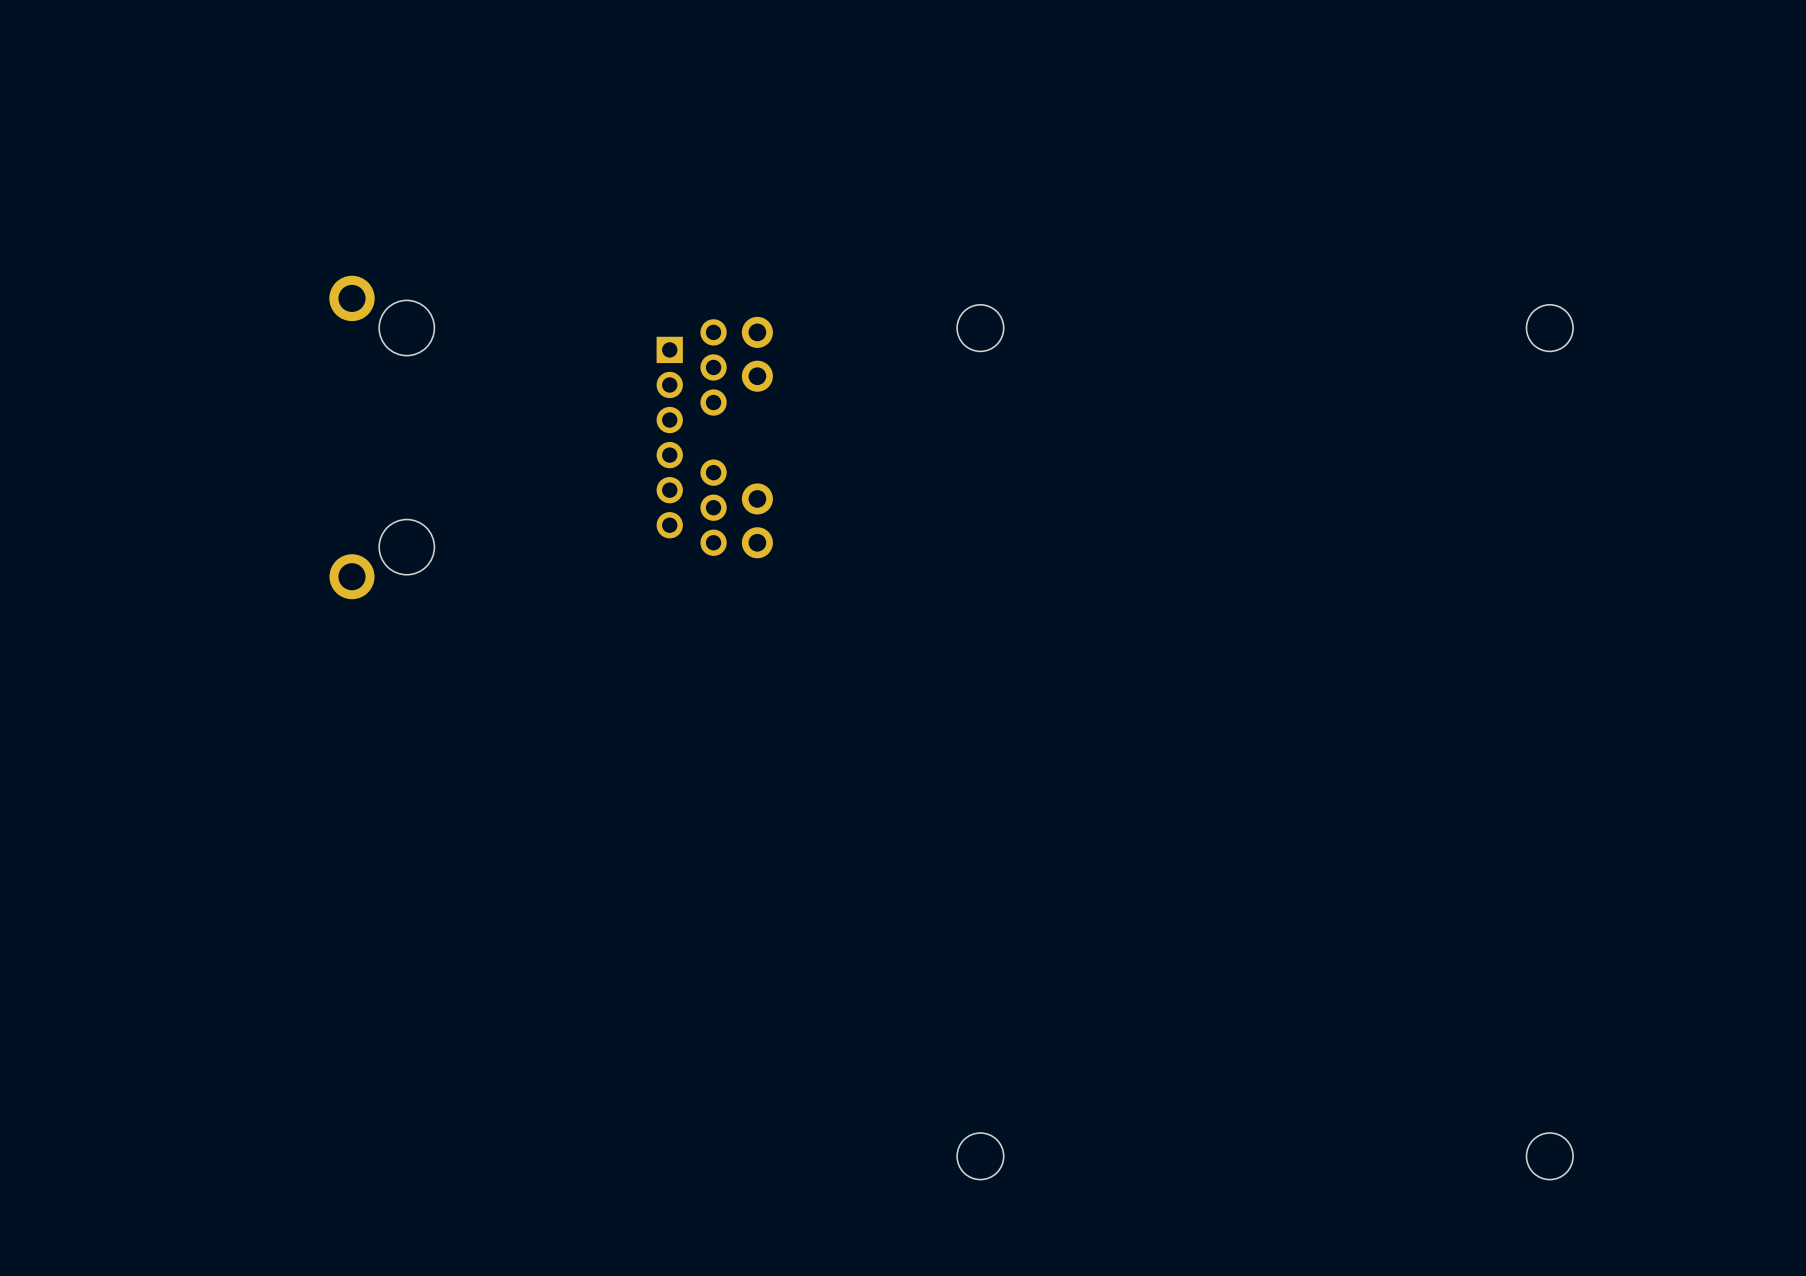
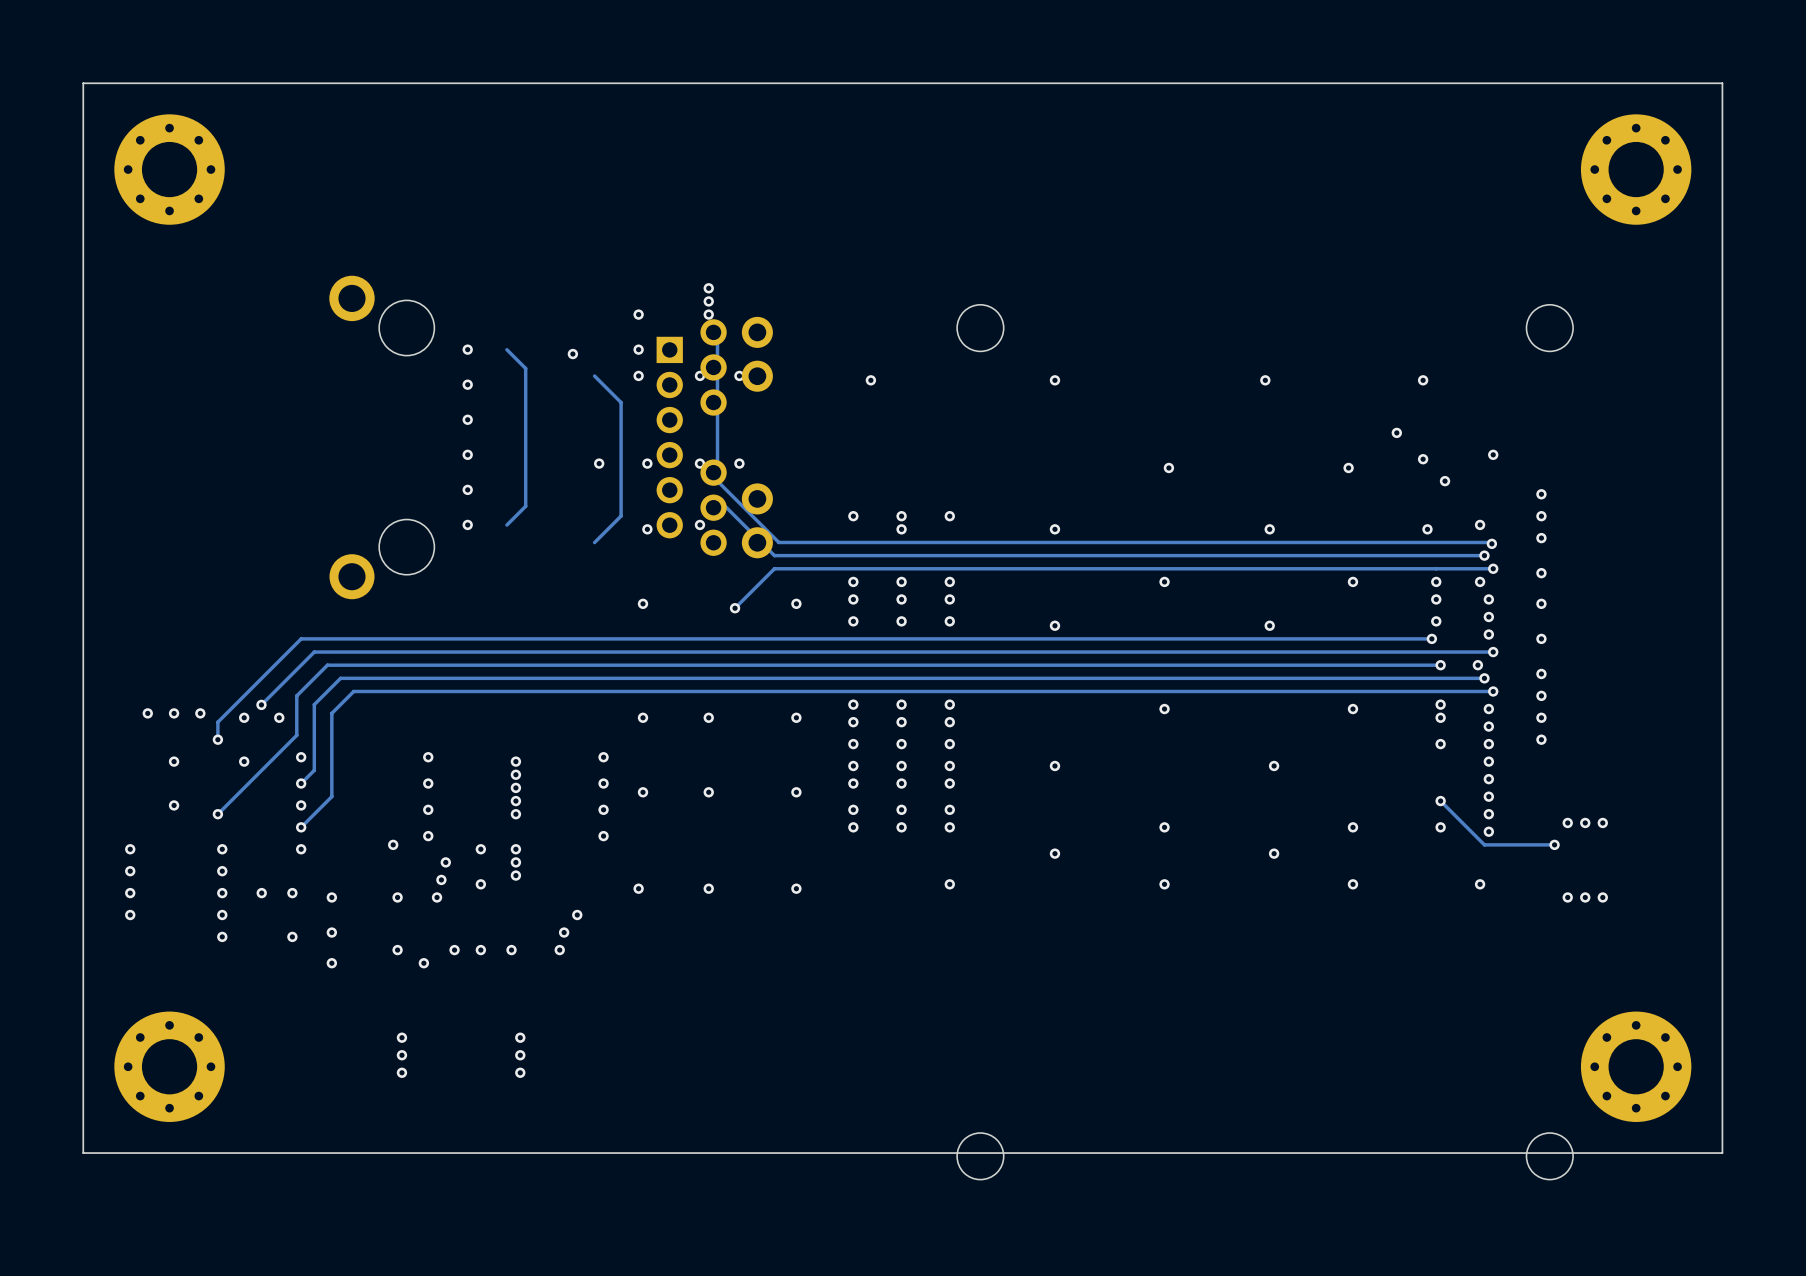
board edge: none -> (1722, 83) (1722, 1153) (83, 1153) (83, 83) (1722, 83)
part: none -> (169, 169)
part: none -> (1636, 169)
via: none -> (708, 288)
via: none -> (708, 301)
via: none -> (638, 314)
via: none -> (708, 314)
track: none -> (717, 332) (717, 481) (778, 542) (1491, 543)
via: none -> (467, 349)
track: none -> (506, 349) (525, 368) (525, 506) (506, 525)
via: none -> (638, 349)
via: none -> (572, 354)
via: none -> (638, 375)
via: none -> (699, 375)
via: none -> (739, 375)
track: none -> (594, 376) (621, 402) (621, 516) (594, 542)
via: none -> (870, 380)
via: none -> (1054, 380)
via: none -> (1265, 380)
via: none -> (1423, 380)
via: none -> (467, 384)
via: none -> (467, 419)
via: none -> (1396, 432)
via: none -> (467, 454)
via: none -> (1493, 454)
via: none -> (1423, 459)
via: none -> (599, 463)
via: none -> (647, 463)
via: none -> (699, 463)
via: none -> (739, 463)
via: none -> (1168, 467)
via: none -> (1348, 467)
via: none -> (1445, 481)
via: none -> (467, 489)
via: none -> (1541, 494)
track: none -> (717, 498) (774, 555) (1484, 555)
via: none -> (853, 516)
via: none -> (901, 516)
via: none -> (949, 516)
via: none -> (1541, 516)
via: none -> (467, 524)
via: none -> (699, 524)
via: none -> (1480, 524)
via: none -> (647, 529)
via: none -> (901, 529)
via: none -> (1054, 529)
via: none -> (1269, 529)
via: none -> (1427, 529)
via: none -> (1541, 538)
via: none -> (1491, 543)
via: none -> (1484, 555)
track: none -> (1493, 568) (774, 568) (735, 608)
via: none -> (1493, 568)
via: none -> (1541, 573)
via: none -> (853, 581)
via: none -> (901, 581)
via: none -> (949, 581)
via: none -> (1164, 581)
via: none -> (1352, 581)
via: none -> (1436, 581)
via: none -> (1480, 581)
via: none -> (853, 599)
via: none -> (901, 599)
via: none -> (949, 599)
via: none -> (1436, 599)
via: none -> (1488, 599)
via: none -> (643, 603)
via: none -> (796, 603)
via: none -> (1541, 603)
via: none -> (735, 608)
via: none -> (1488, 616)
via: none -> (853, 621)
via: none -> (901, 621)
via: none -> (949, 621)
via: none -> (1436, 621)
via: none -> (1054, 625)
via: none -> (1269, 625)
via: none -> (1488, 634)
track: none -> (1431, 638) (301, 638) (217, 722) (217, 739)
via: none -> (1431, 638)
via: none -> (1541, 638)
track: none -> (1493, 652) (314, 652) (261, 704)
via: none -> (1493, 652)
track: none -> (1440, 665) (327, 665) (296, 695) (296, 735) (217, 814)
via: none -> (1440, 665)
via: none -> (1477, 665)
via: none -> (1541, 673)
track: none -> (1484, 678) (340, 678) (314, 704) (314, 770) (301, 783)
via: none -> (1484, 678)
track: none -> (1493, 691) (353, 691) (331, 713) (331, 796) (301, 827)
via: none -> (1493, 691)
via: none -> (1541, 695)
via: none -> (261, 704)
via: none -> (853, 704)
via: none -> (901, 704)
via: none -> (949, 704)
via: none -> (1440, 704)
via: none -> (1164, 709)
via: none -> (1352, 709)
via: none -> (1488, 709)
via: none -> (147, 713)
via: none -> (174, 713)
via: none -> (200, 713)
via: none -> (244, 717)
via: none -> (279, 717)
via: none -> (643, 717)
via: none -> (708, 717)
via: none -> (796, 717)
via: none -> (1440, 717)
via: none -> (1541, 717)
via: none -> (853, 722)
via: none -> (901, 722)
via: none -> (949, 722)
via: none -> (1488, 726)
via: none -> (217, 739)
via: none -> (1541, 739)
via: none -> (853, 744)
via: none -> (901, 744)
via: none -> (949, 744)
via: none -> (1440, 744)
via: none -> (1488, 744)
via: none -> (301, 757)
via: none -> (428, 757)
via: none -> (603, 757)
via: none -> (174, 761)
via: none -> (244, 761)
via: none -> (515, 761)
via: none -> (1488, 761)
via: none -> (853, 765)
via: none -> (901, 765)
via: none -> (949, 765)
via: none -> (1054, 765)
via: none -> (1274, 765)
via: none -> (515, 774)
via: none -> (1488, 779)
via: none -> (301, 783)
via: none -> (428, 783)
via: none -> (603, 783)
via: none -> (853, 783)
via: none -> (901, 783)
via: none -> (949, 783)
via: none -> (515, 787)
via: none -> (643, 792)
via: none -> (708, 792)
via: none -> (796, 792)
via: none -> (1488, 796)
via: none -> (515, 801)
track: none -> (1440, 801) (1484, 844) (1554, 844)
via: none -> (1440, 801)
via: none -> (174, 805)
via: none -> (301, 805)
via: none -> (428, 809)
via: none -> (603, 809)
via: none -> (853, 809)
via: none -> (901, 809)
via: none -> (949, 809)
via: none -> (217, 814)
via: none -> (515, 814)
via: none -> (1488, 814)
via: none -> (1567, 822)
via: none -> (1585, 822)
via: none -> (1602, 822)
via: none -> (301, 827)
via: none -> (853, 827)
via: none -> (901, 827)
via: none -> (949, 827)
via: none -> (1164, 827)
via: none -> (1352, 827)
via: none -> (1440, 827)
via: none -> (1488, 831)
via: none -> (428, 836)
via: none -> (603, 836)
via: none -> (393, 844)
via: none -> (1554, 844)
via: none -> (130, 849)
via: none -> (222, 849)
via: none -> (301, 849)
via: none -> (480, 849)
via: none -> (515, 849)
via: none -> (1054, 853)
via: none -> (1274, 853)
via: none -> (445, 862)
via: none -> (515, 862)
via: none -> (130, 871)
via: none -> (222, 871)
via: none -> (515, 875)
via: none -> (441, 879)
via: none -> (480, 884)
via: none -> (949, 884)
via: none -> (1164, 884)
via: none -> (1352, 884)
via: none -> (1480, 884)
via: none -> (638, 888)
via: none -> (708, 888)
via: none -> (796, 888)
via: none -> (130, 893)
via: none -> (222, 893)
via: none -> (261, 893)
via: none -> (292, 893)
via: none -> (331, 897)
via: none -> (397, 897)
via: none -> (437, 897)
via: none -> (1567, 897)
via: none -> (1585, 897)
via: none -> (1602, 897)
via: none -> (130, 915)
via: none -> (222, 915)
via: none -> (577, 915)
via: none -> (331, 932)
via: none -> (564, 932)
via: none -> (222, 936)
via: none -> (292, 936)
via: none -> (397, 950)
via: none -> (454, 950)
via: none -> (480, 950)
via: none -> (511, 950)
via: none -> (559, 950)
via: none -> (331, 963)
via: none -> (423, 963)
via: none -> (401, 1037)
via: none -> (520, 1037)
via: none -> (401, 1055)
via: none -> (520, 1055)
part: none -> (169, 1066)
part: none -> (1636, 1066)
via: none -> (401, 1072)
via: none -> (520, 1072)

